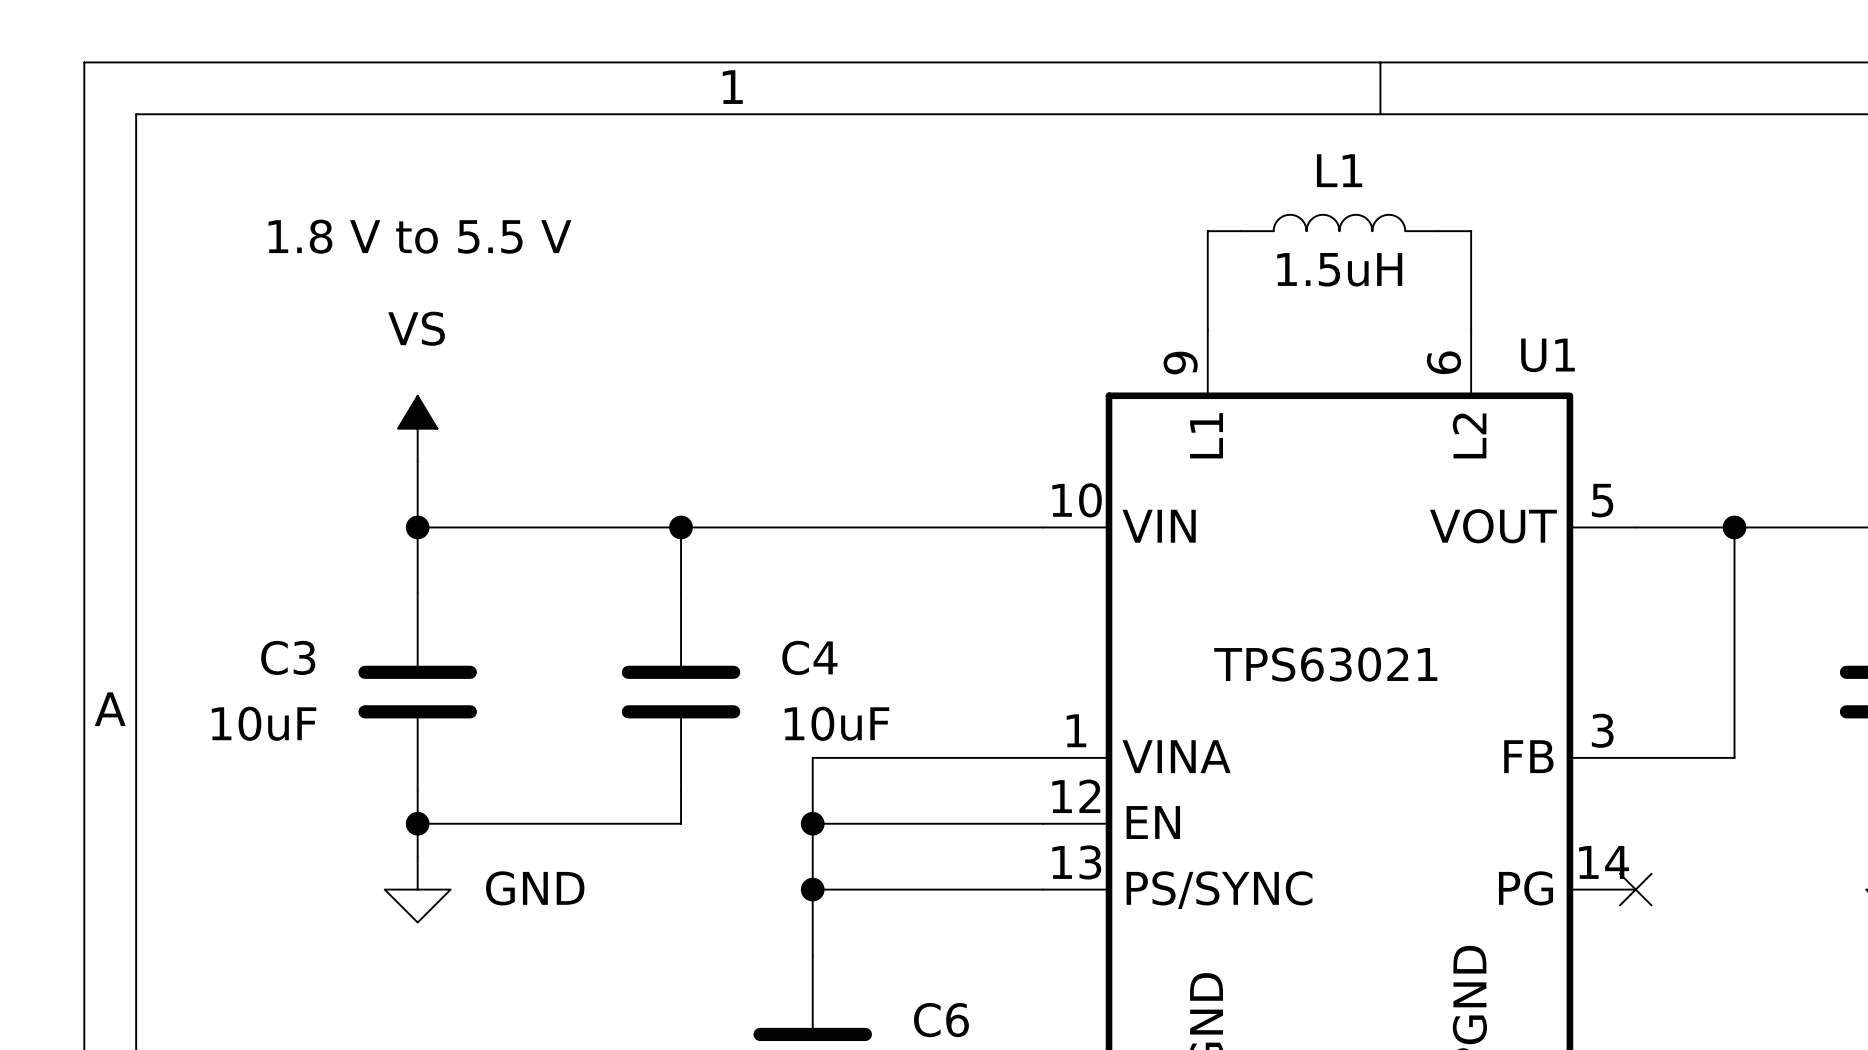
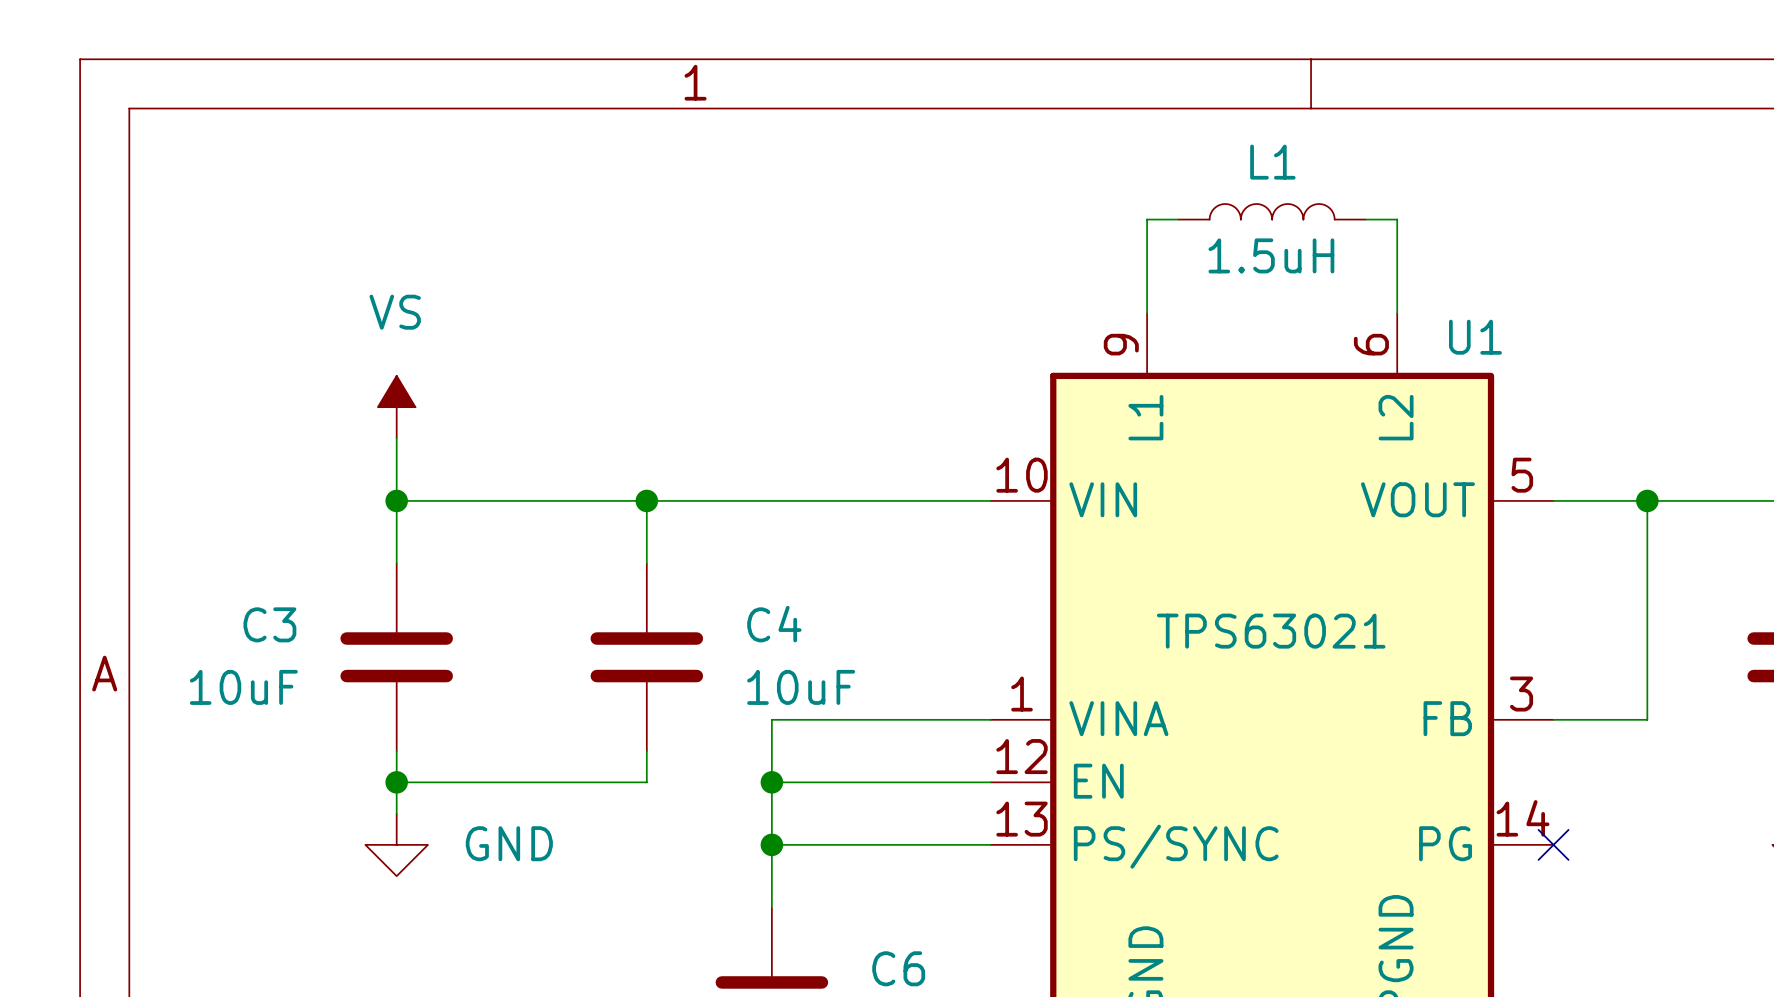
text: 1.8 V to 5.5 V (419, 236) -> none

